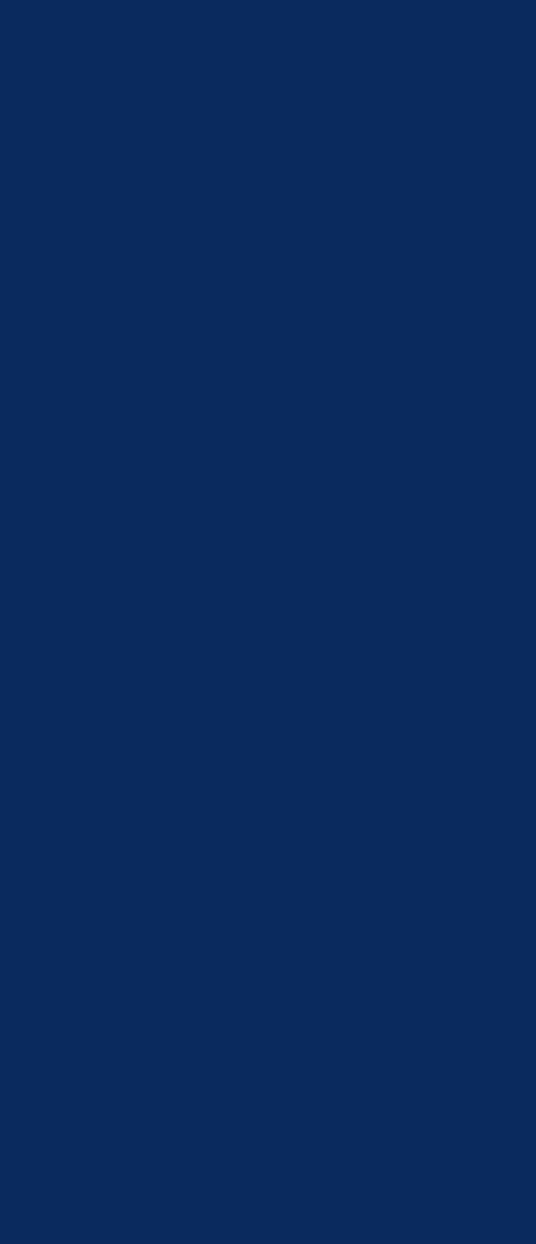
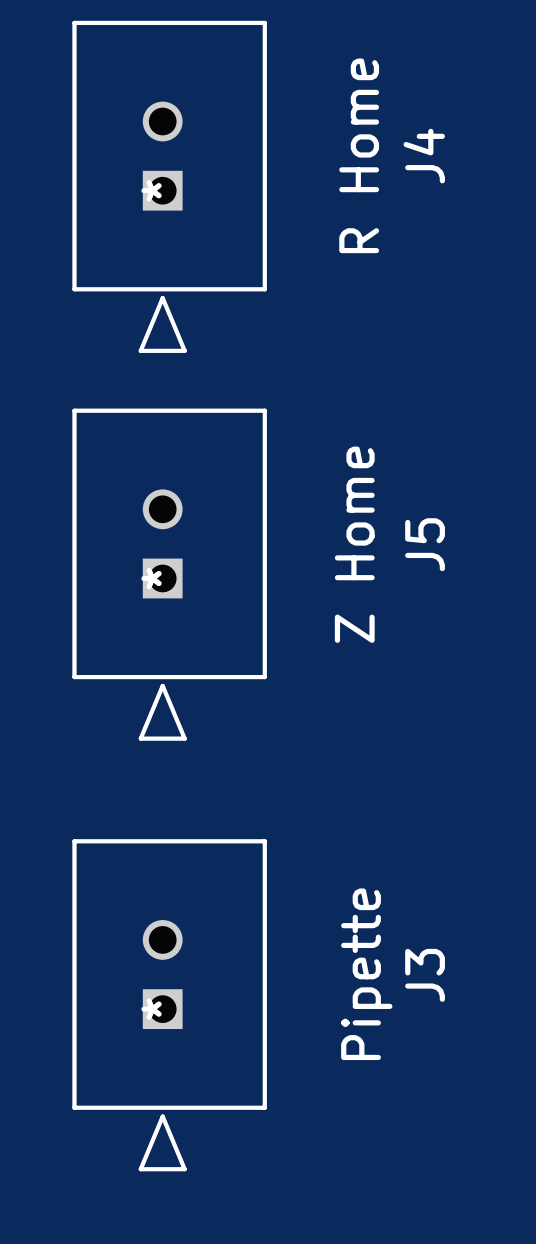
J4: none -> R Home (169, 186)
J5: none -> Z Home (169, 574)
J3: none -> Pipette (169, 1005)

